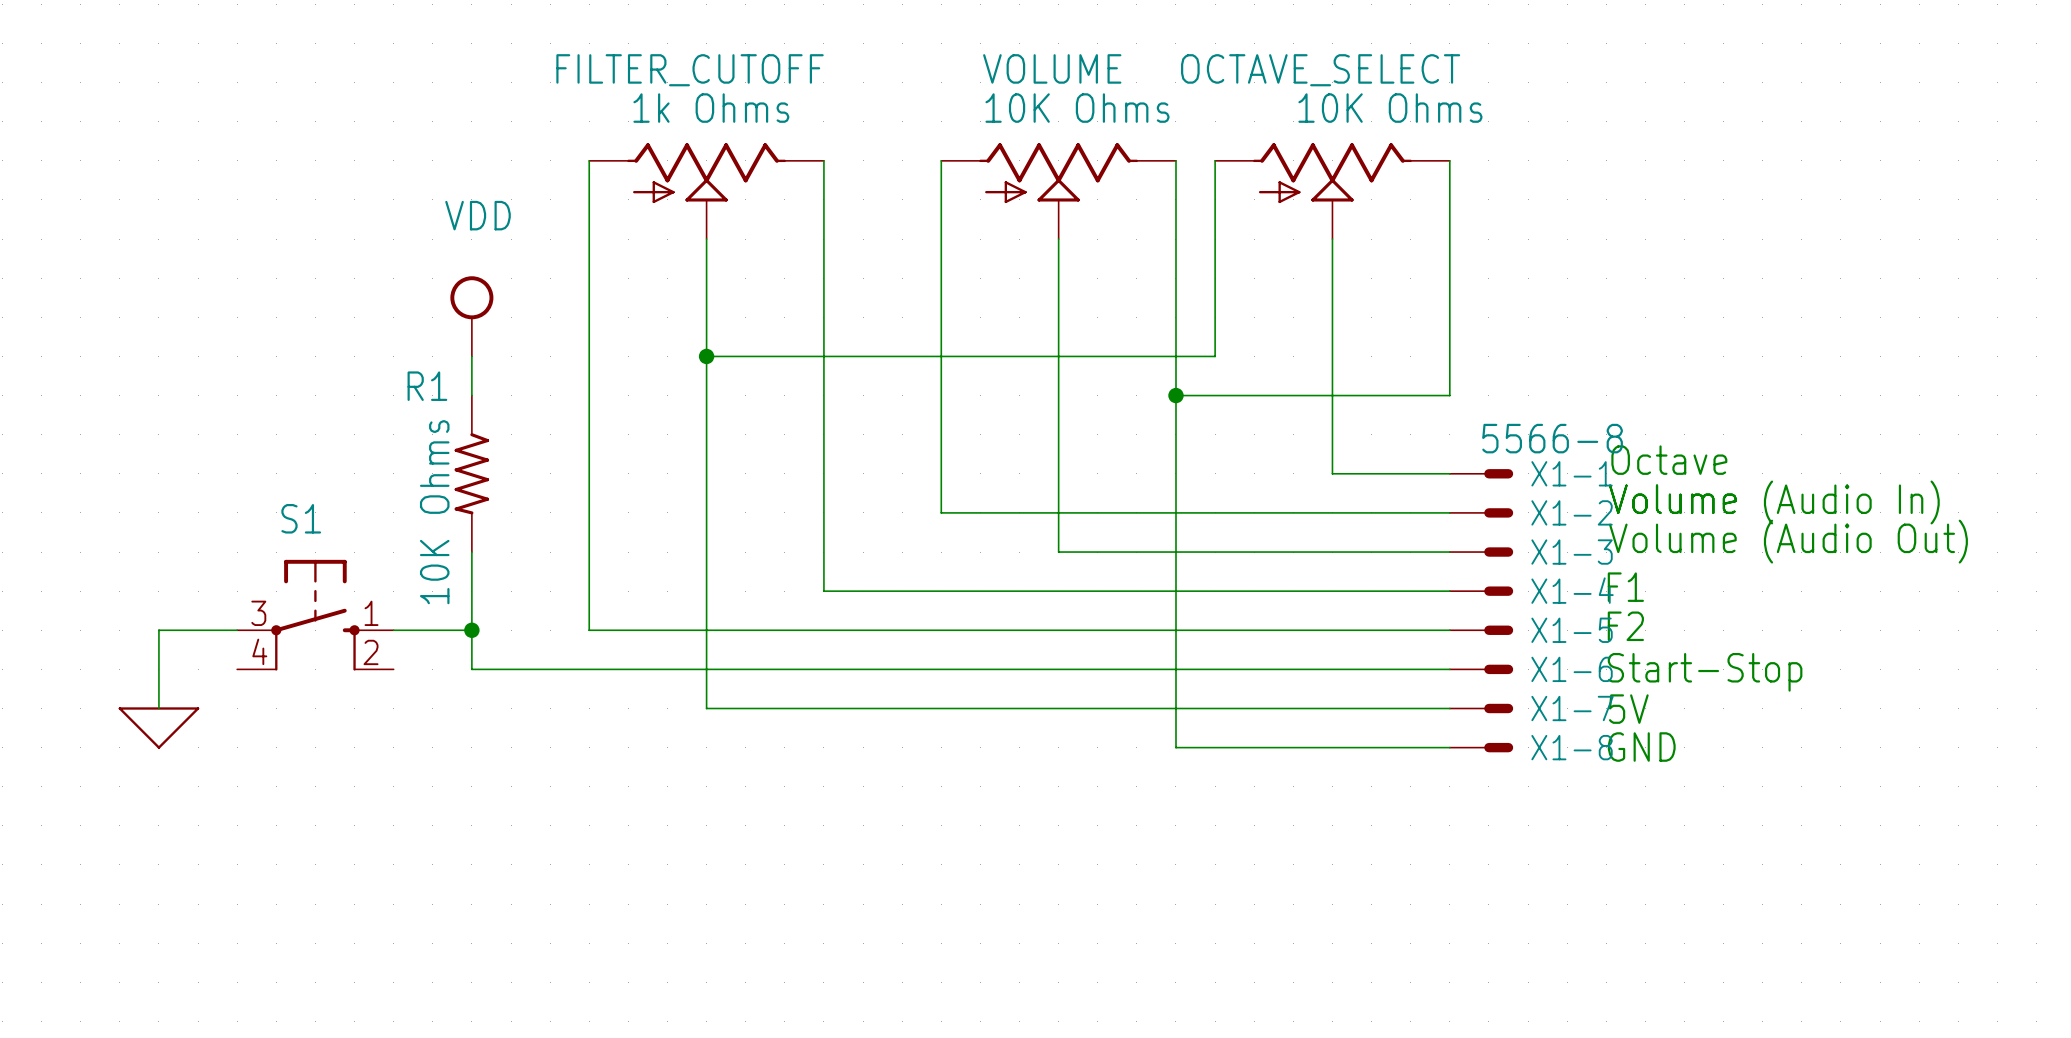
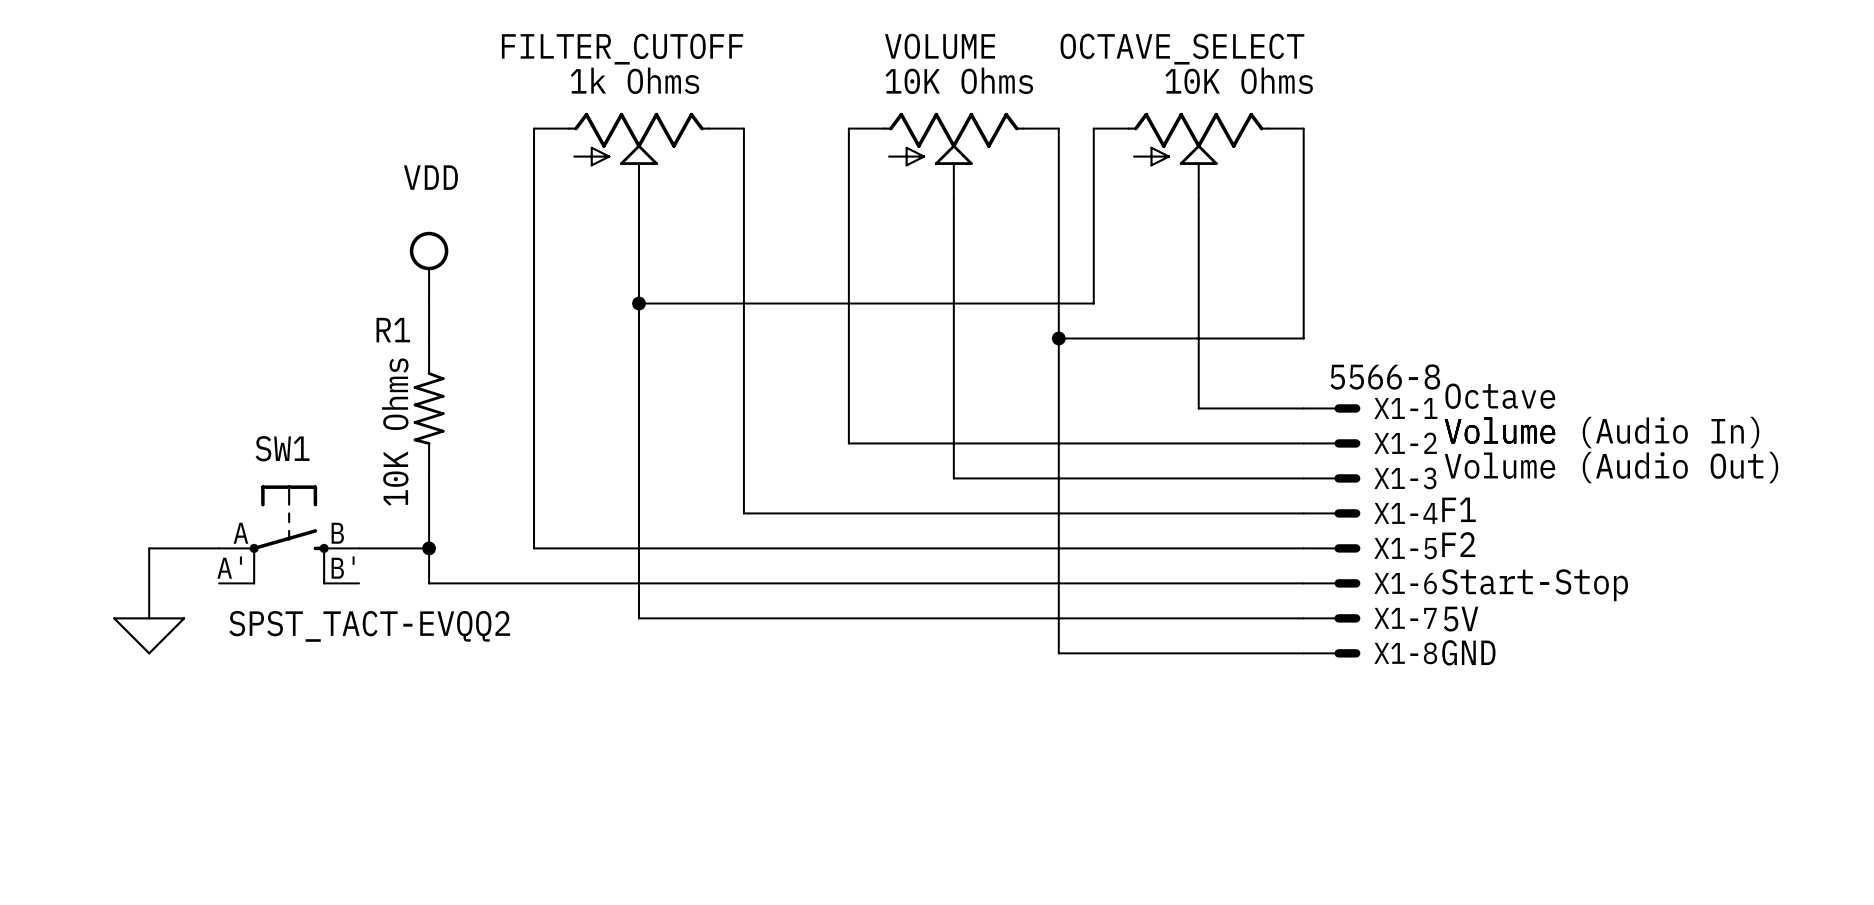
S1 name: S1 (301, 518) -> SW1 (282, 448)
S1 pin number: 3 (258, 613) -> A (240, 533)
S1 pin number: 1 (371, 613) -> B (337, 533)
S1 pin number: 4 (259, 651) -> A' (229, 567)
S1 pin number: 2 (371, 652) -> B' (343, 567)
S1 value: none -> SPST_TACT-EVQQ2 (369, 626)

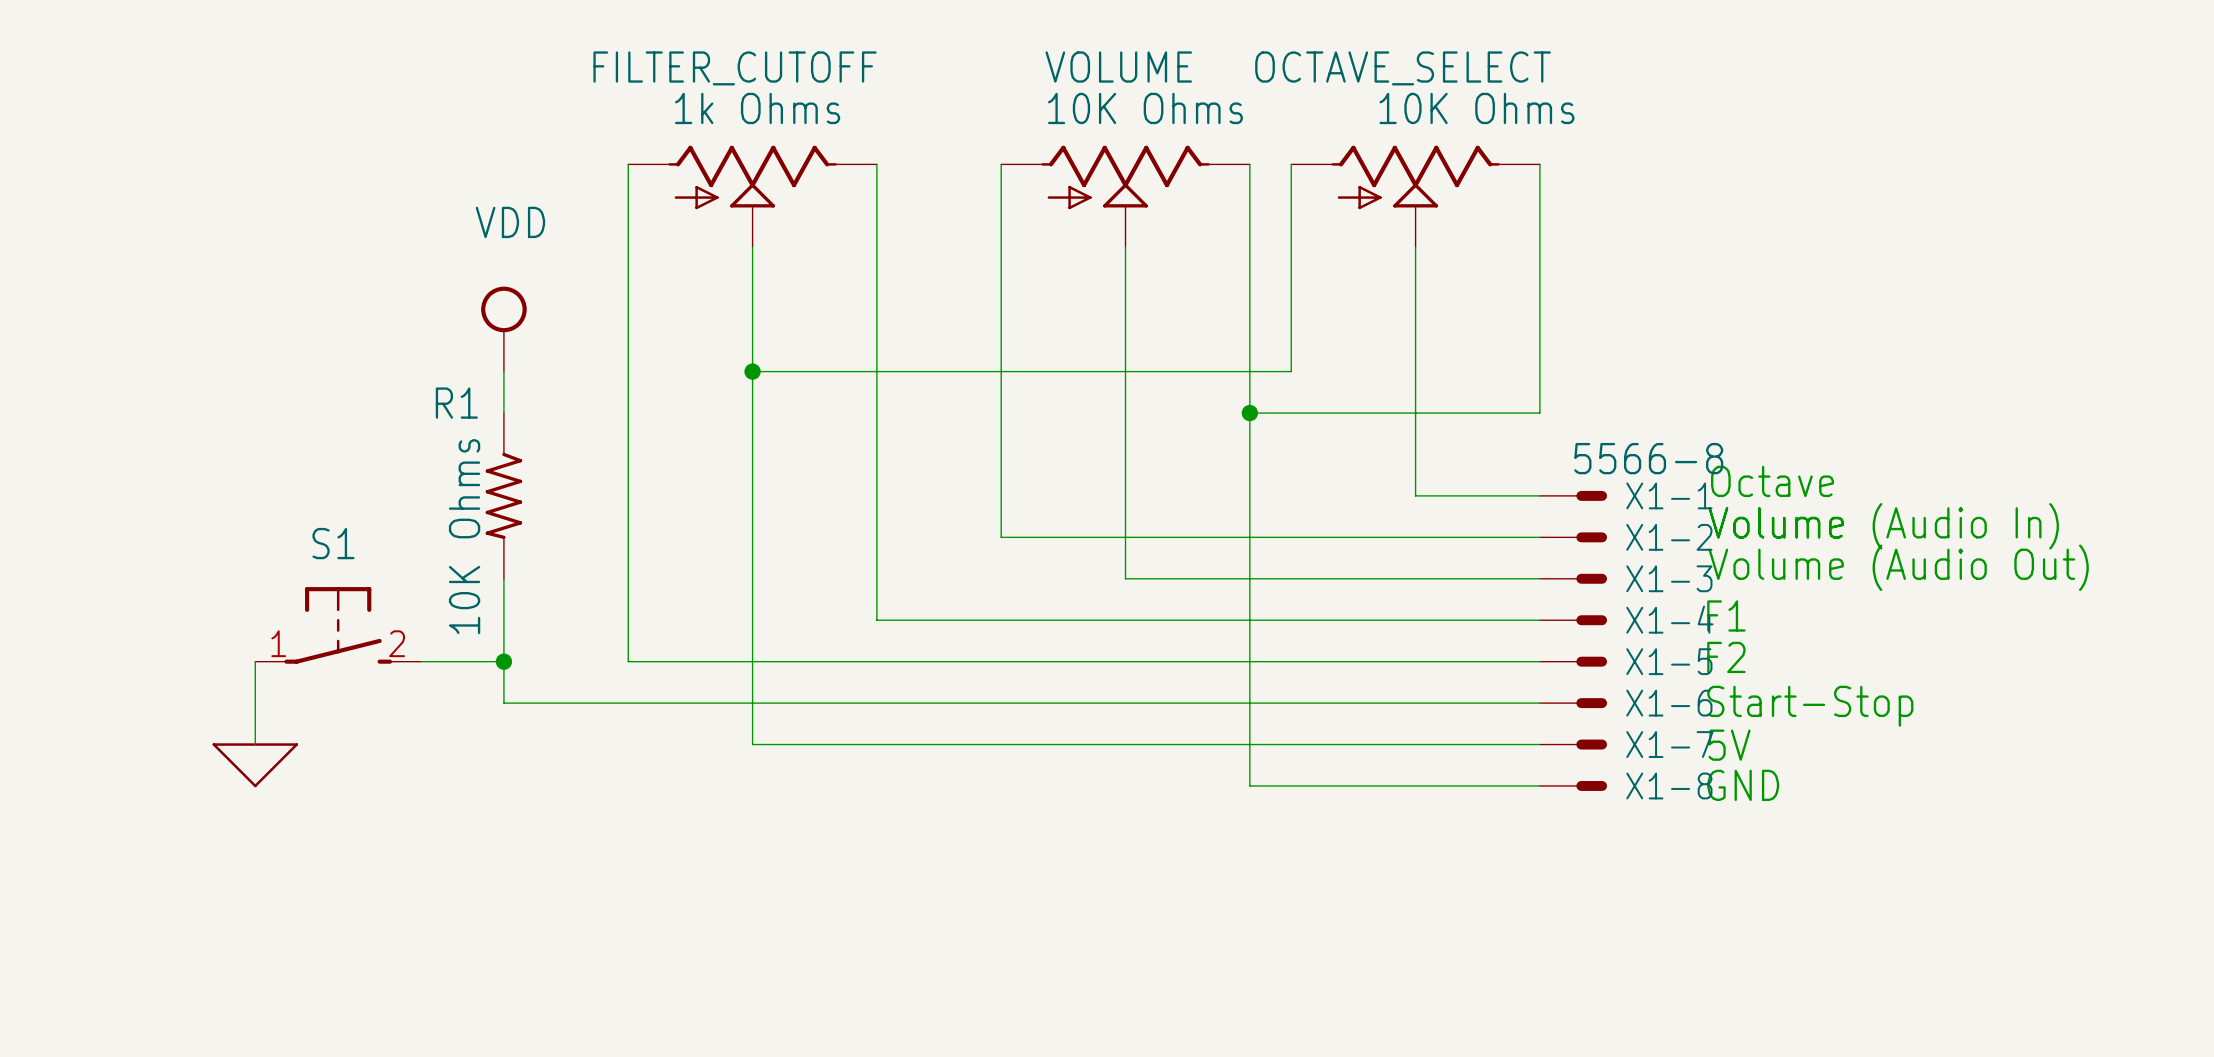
S1: none -> (338, 625)
SW1: SPST_TACT-EVQQ2 (289, 534) -> none
wire: (219, 548) (149, 548) (149, 618) -> (255, 661) (255, 744)
power symbol position: (149, 635) -> (255, 765)

